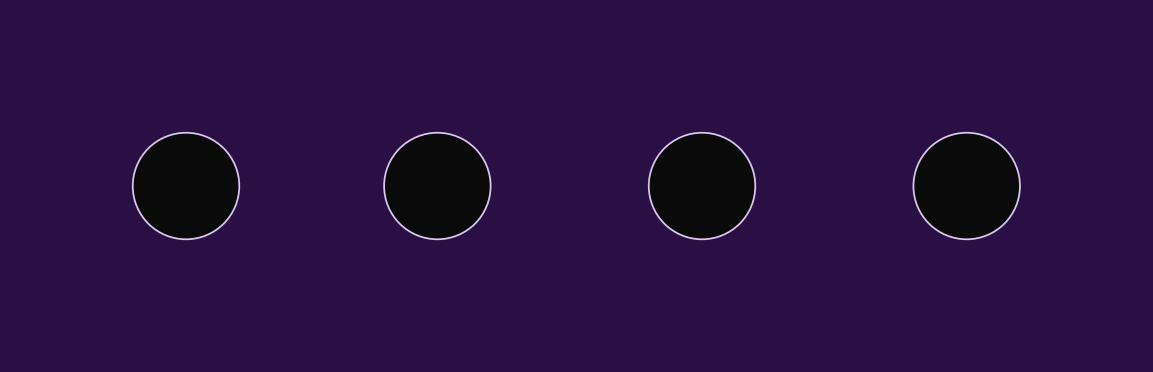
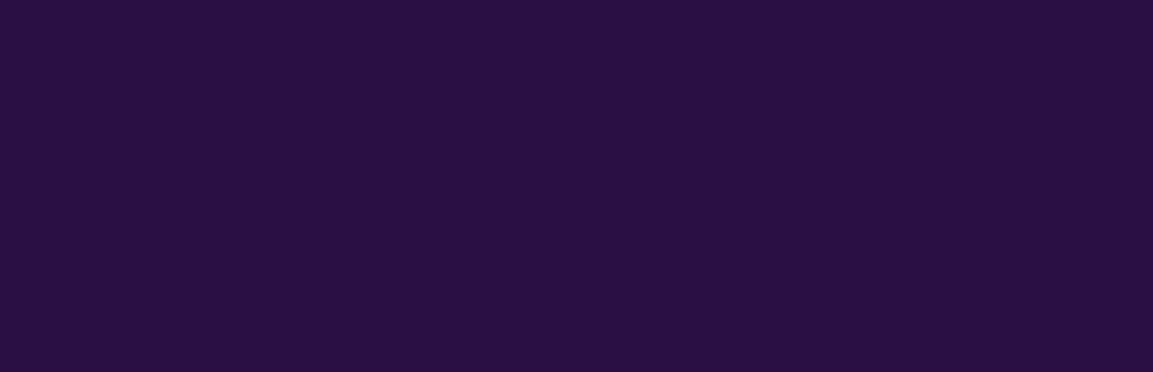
part: (186, 186) -> none
part: (437, 186) -> none
part: (702, 186) -> none
part: (966, 186) -> none

